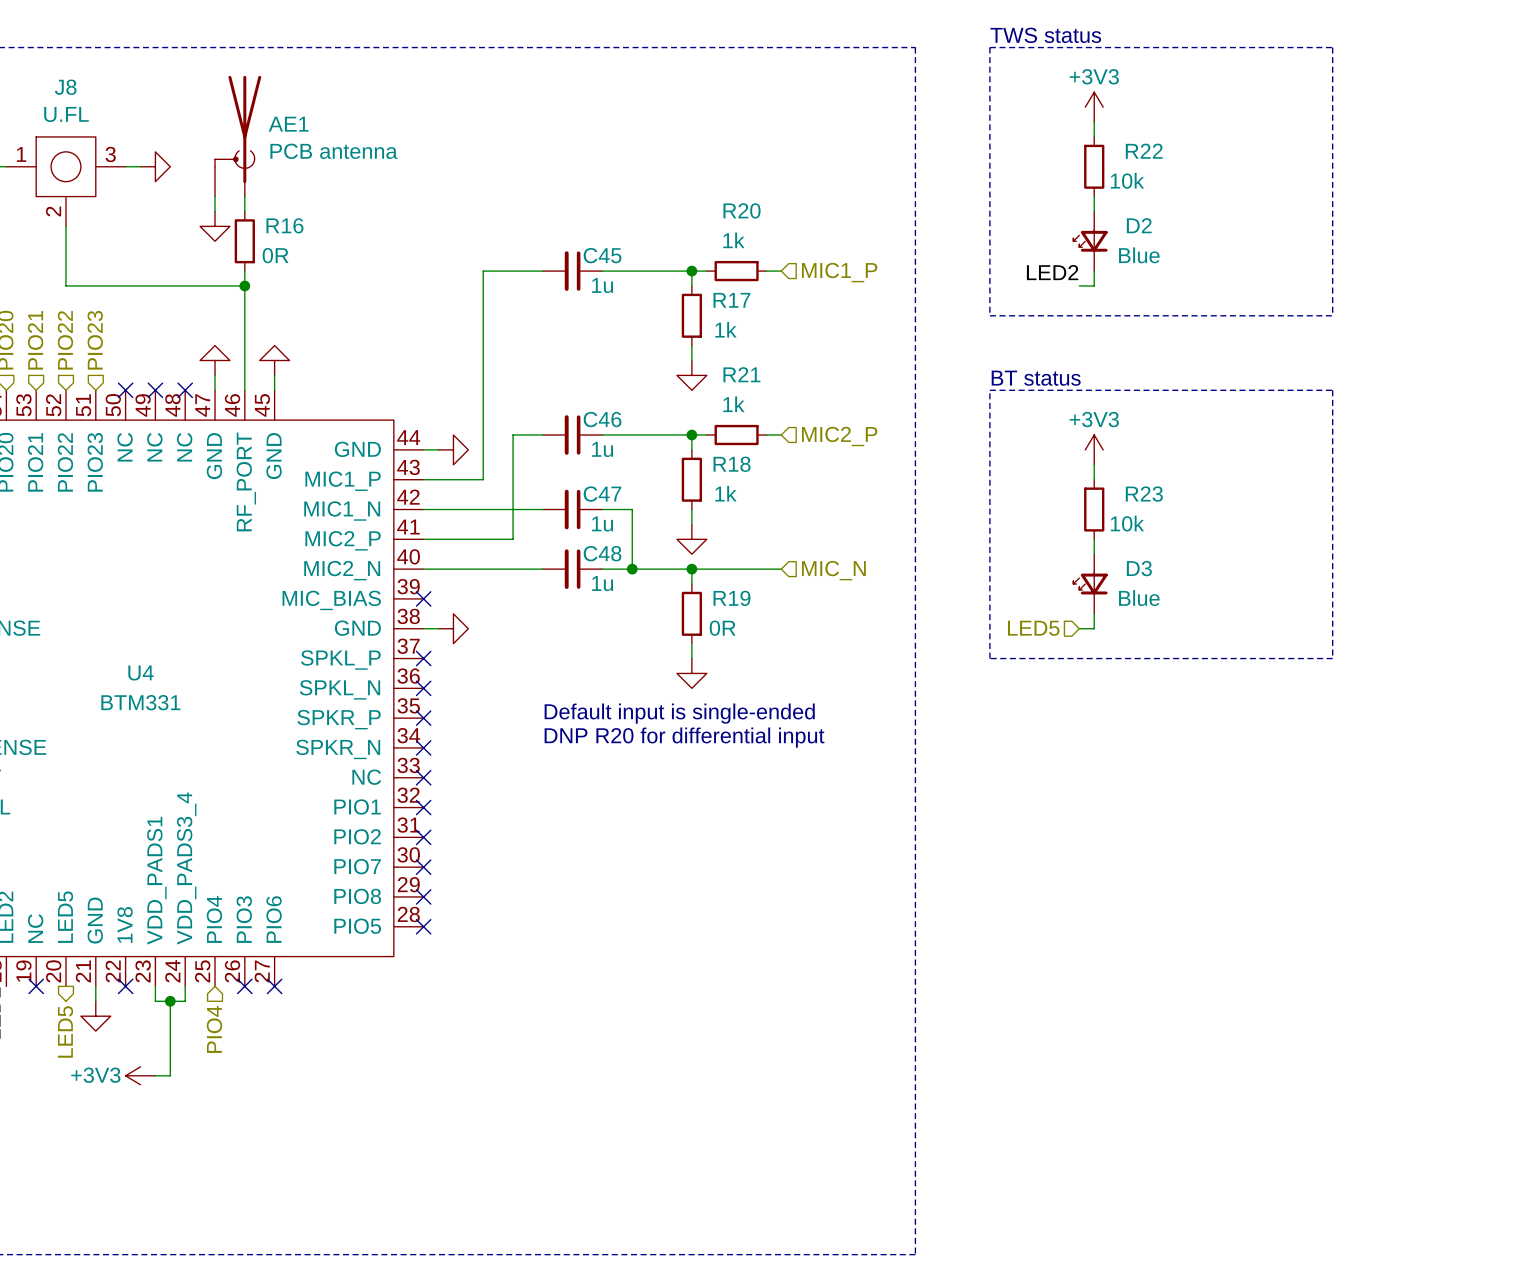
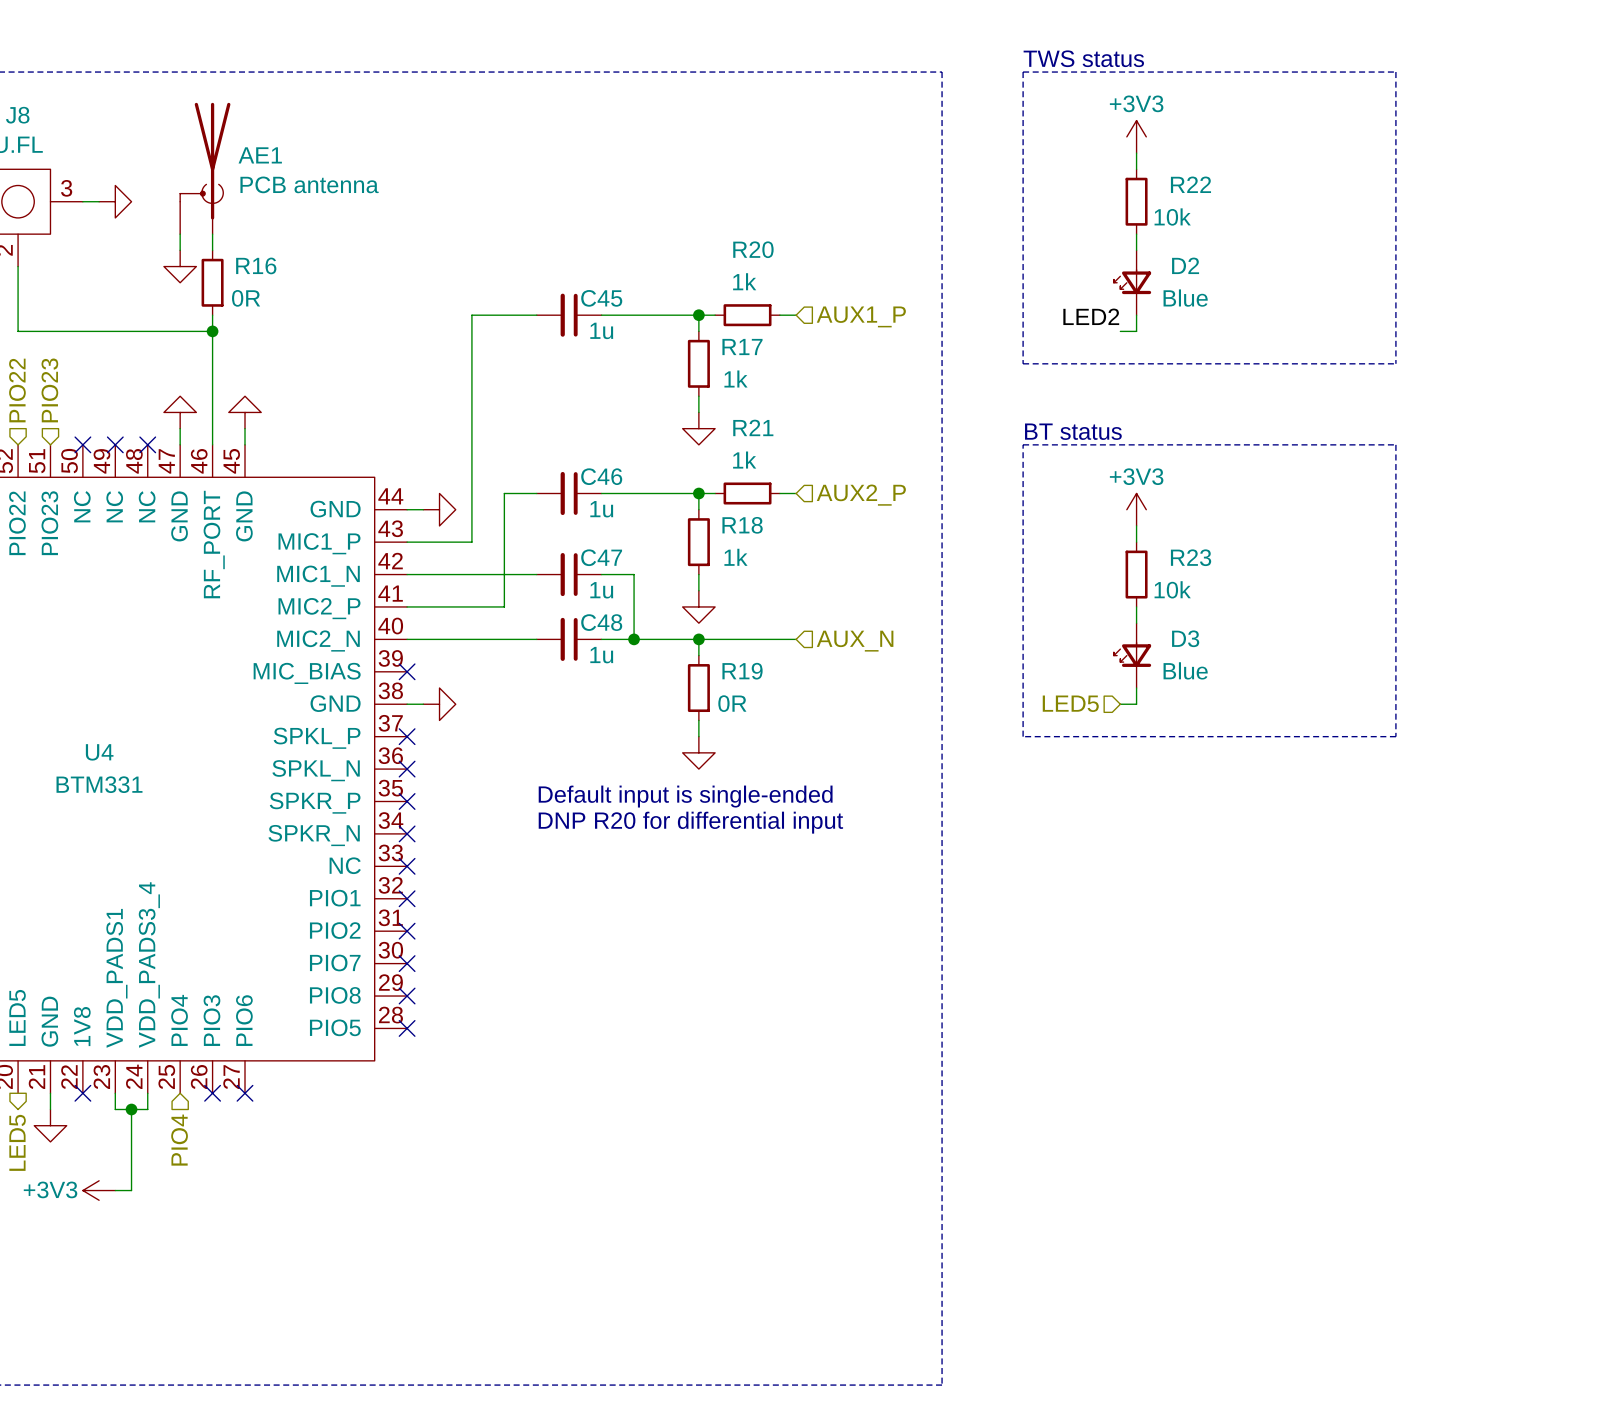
hierarchical label: MIC1_P (839, 272) -> AUX1_P (861, 316)
hierarchical label: MIC2_P (839, 436) -> AUX2_P (861, 495)
hierarchical label: MIC_N (833, 570) -> AUX_N (855, 641)

